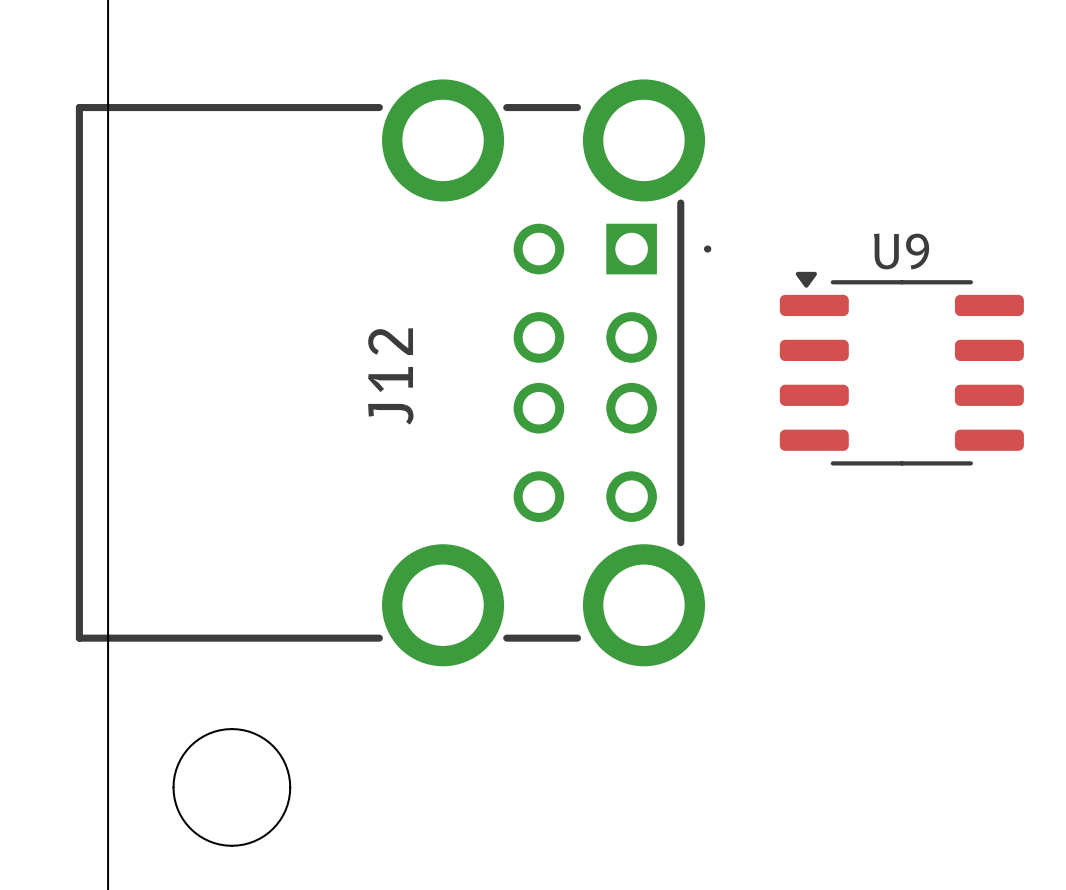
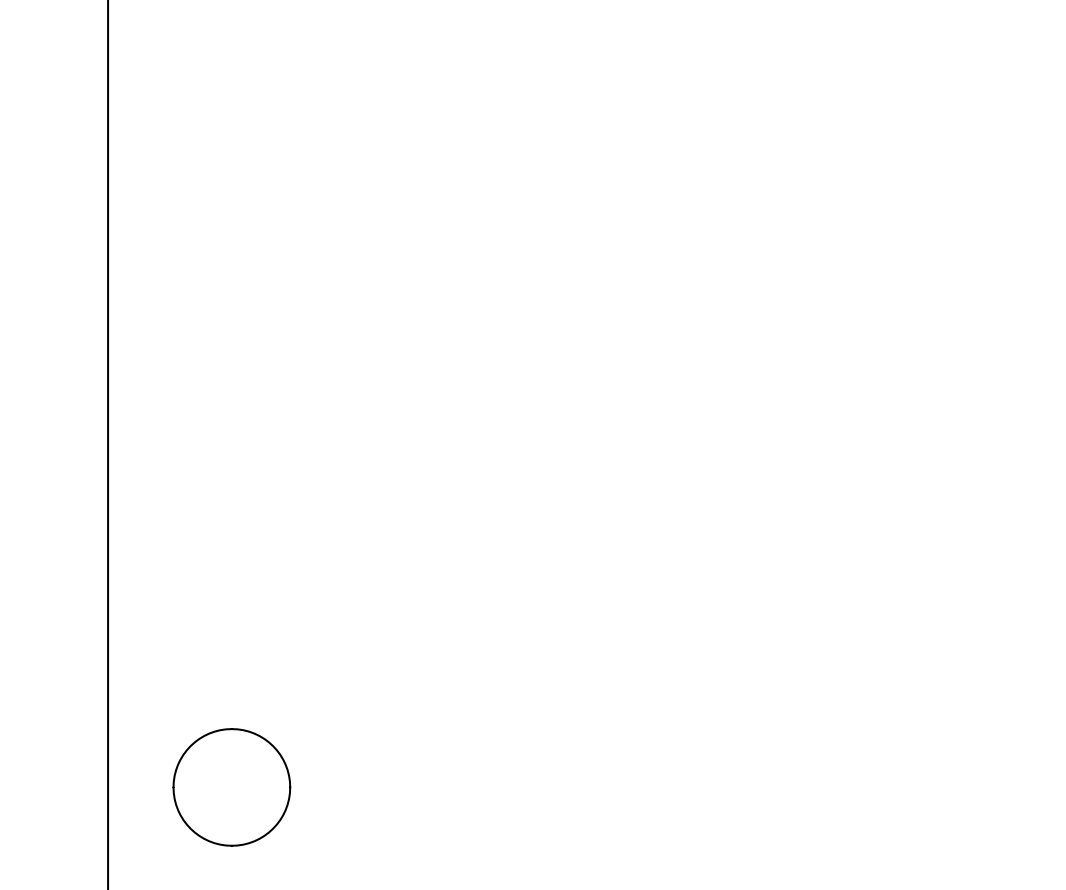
U9: (901, 368) -> none
J12: (393, 372) -> none

